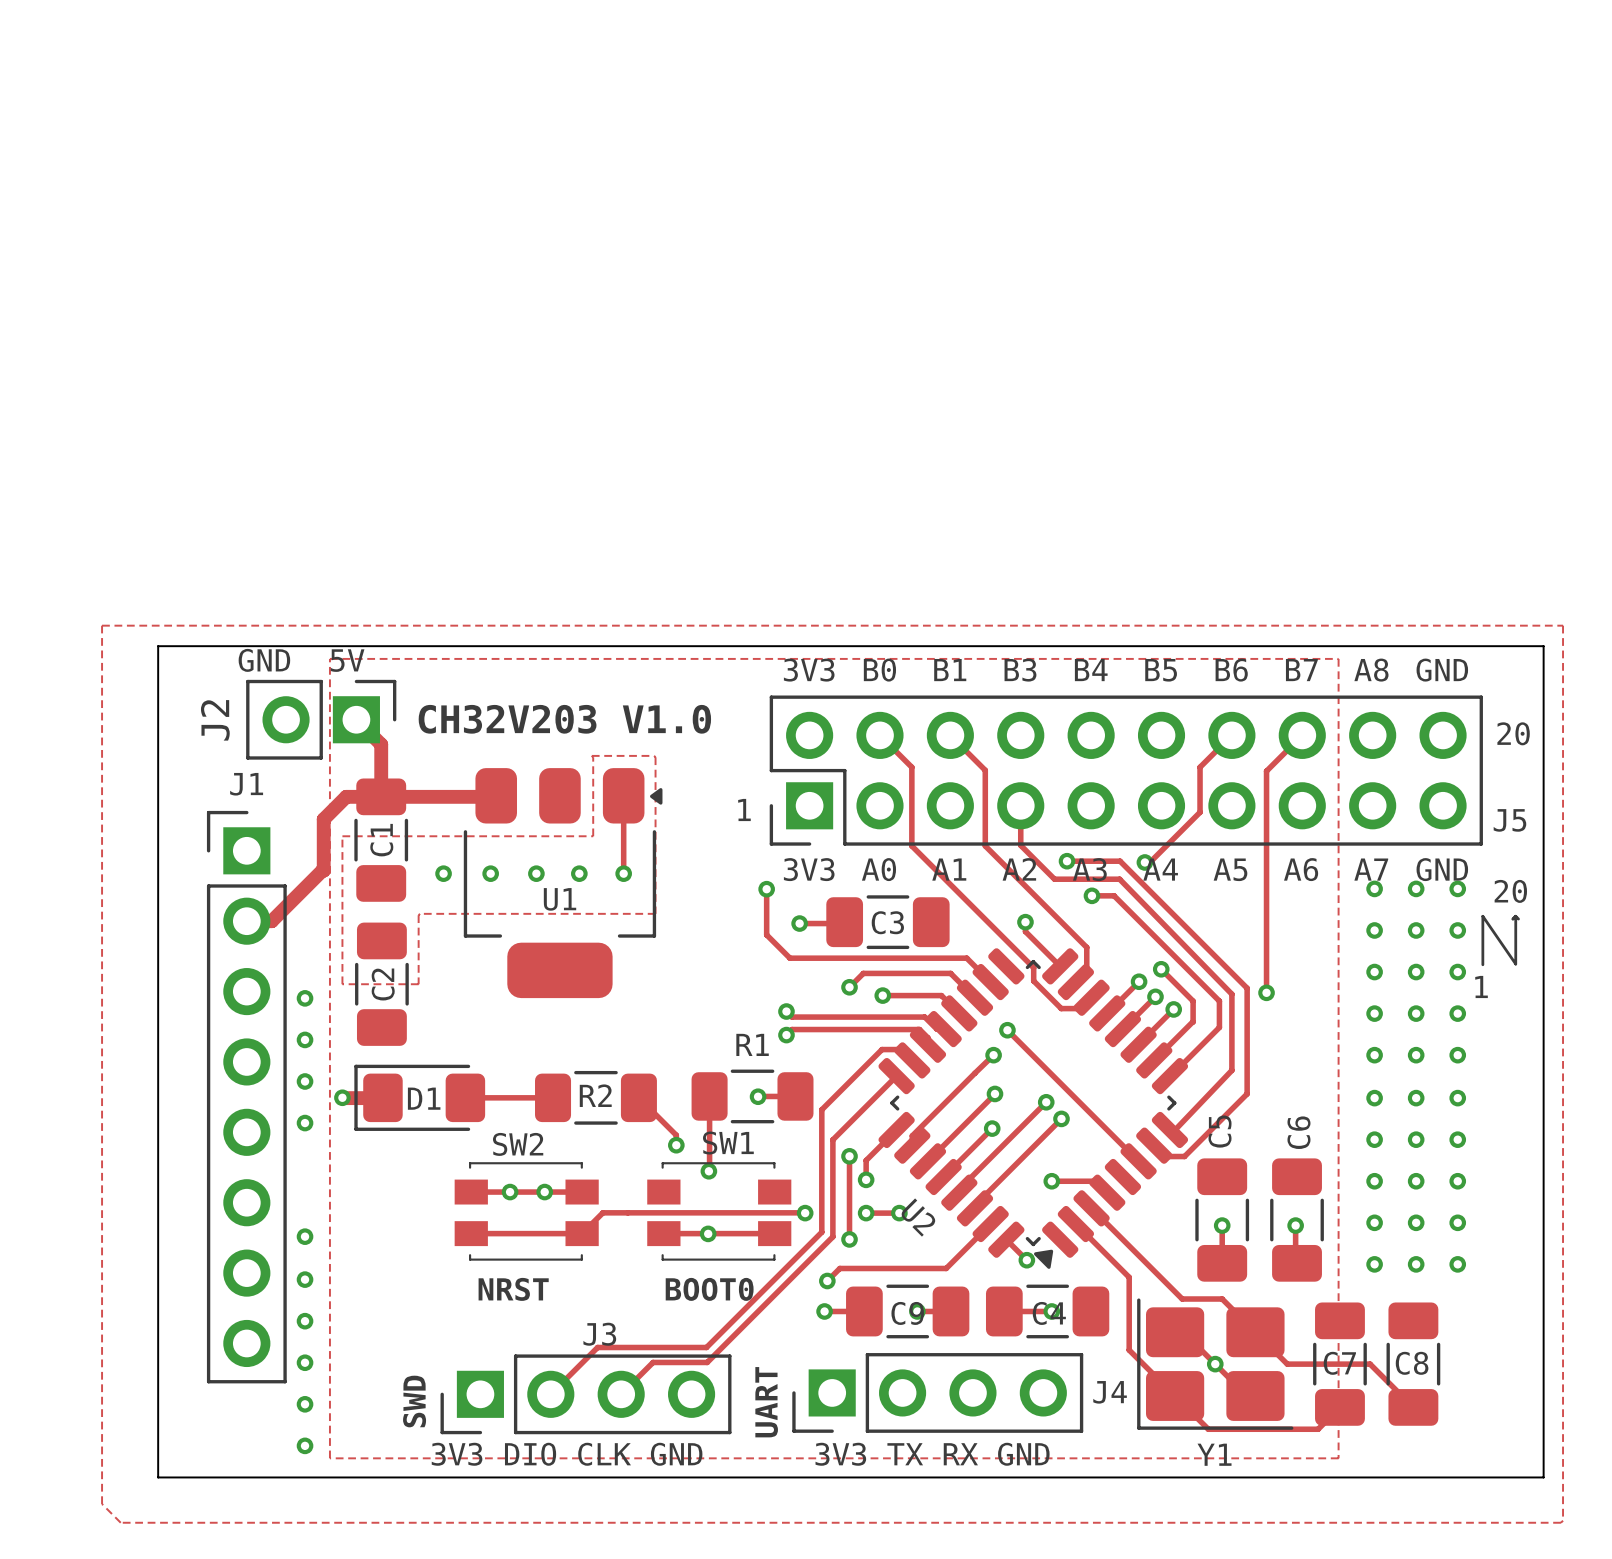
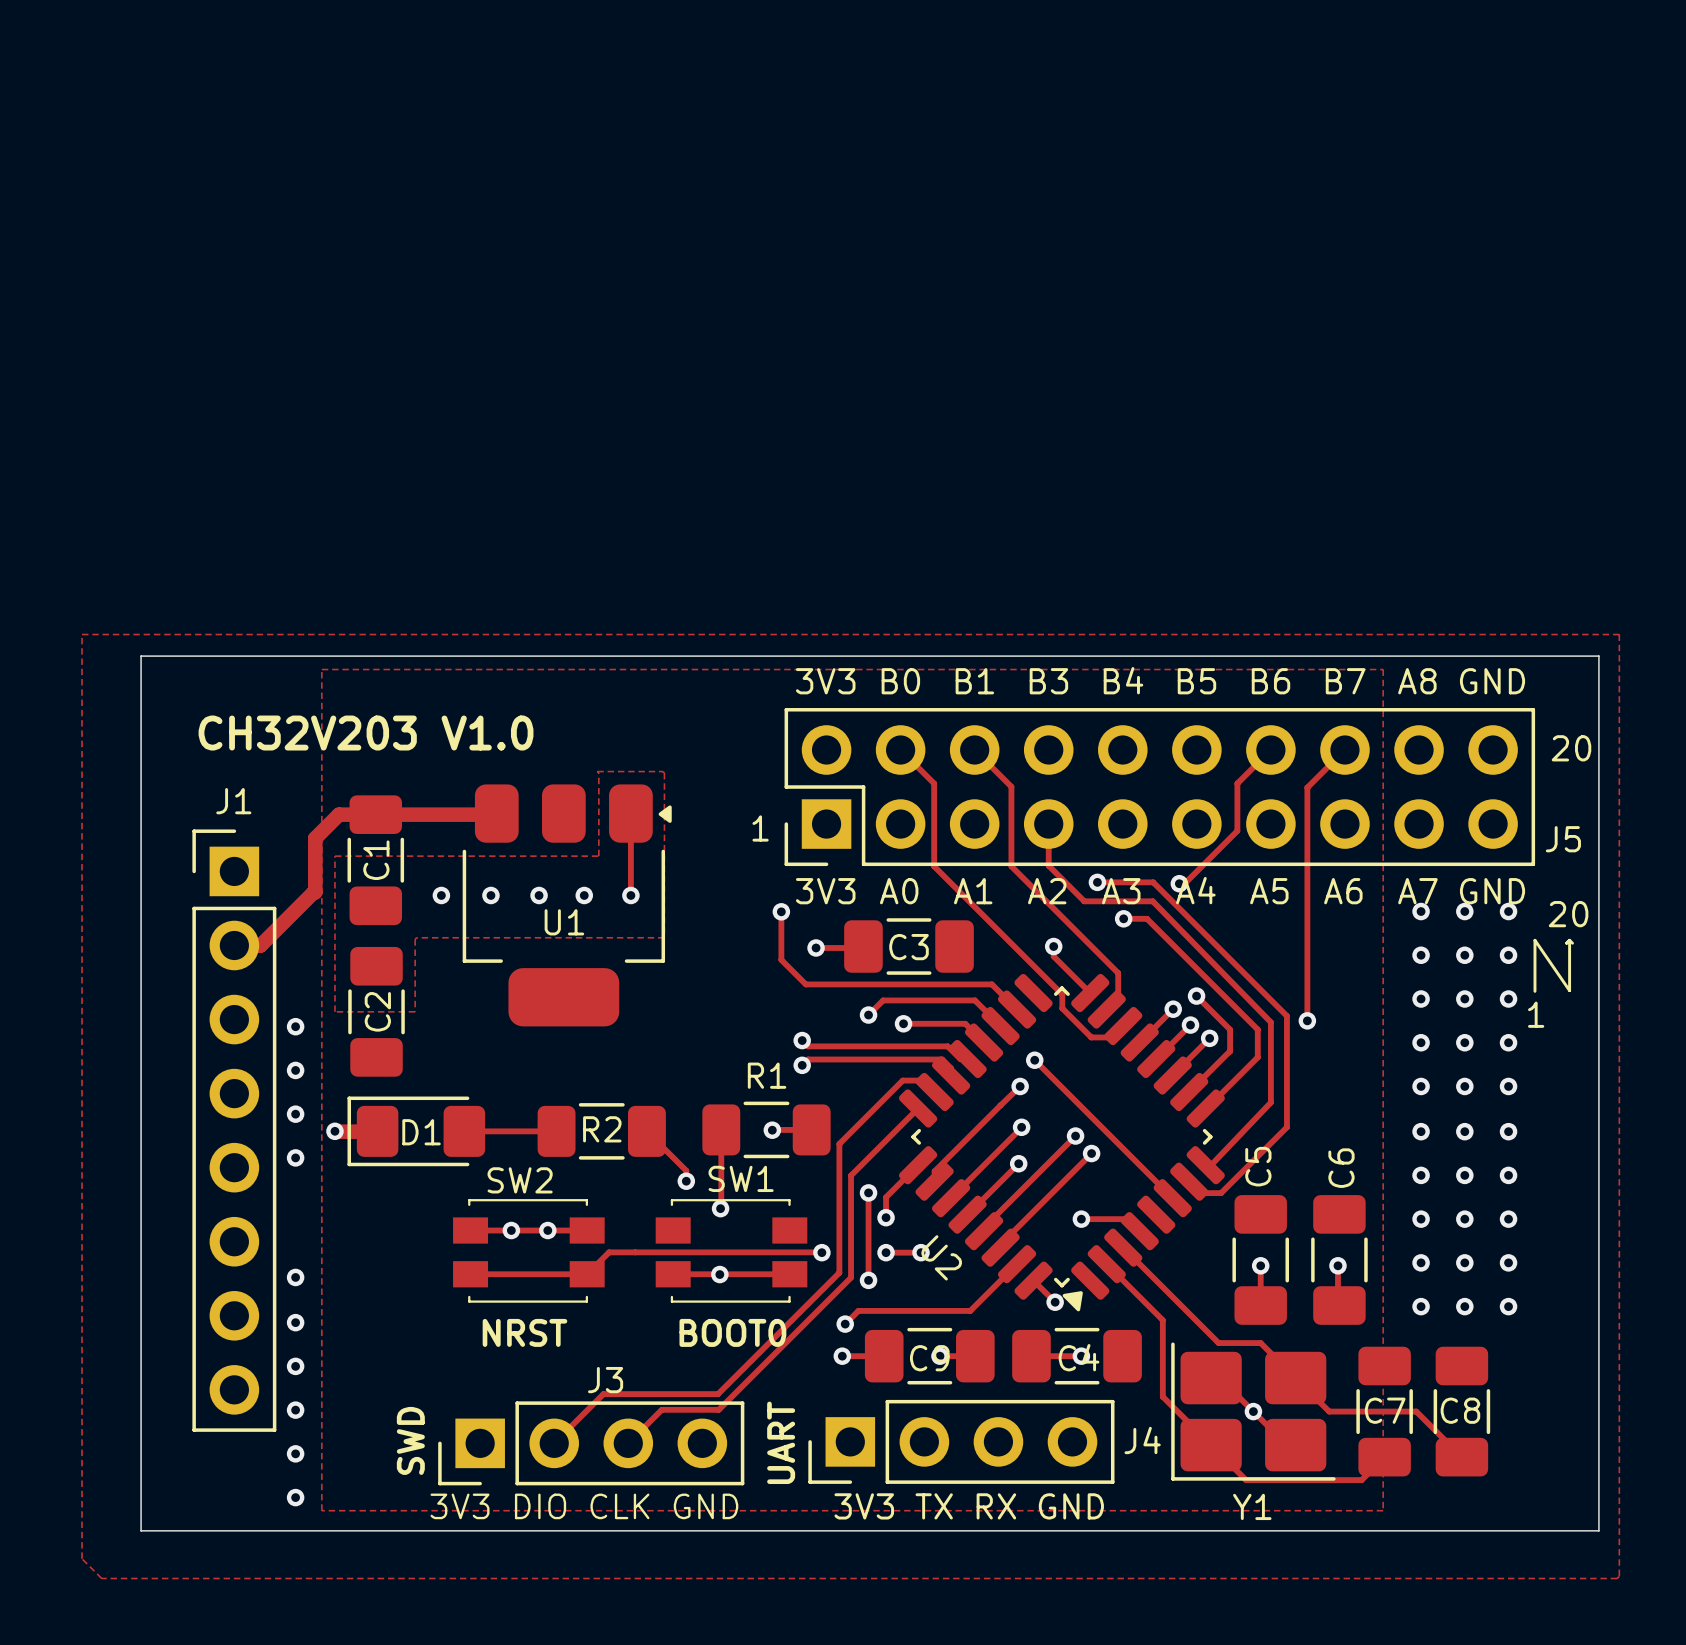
text: GND 5V (301, 660) -> none
J2: (321, 719) -> none
track: (356, 719) (381, 744) (381, 796) -> none
text position: CH32V203 V1.0 (564, 719) -> CH32V203 V1.0 (366, 733)

